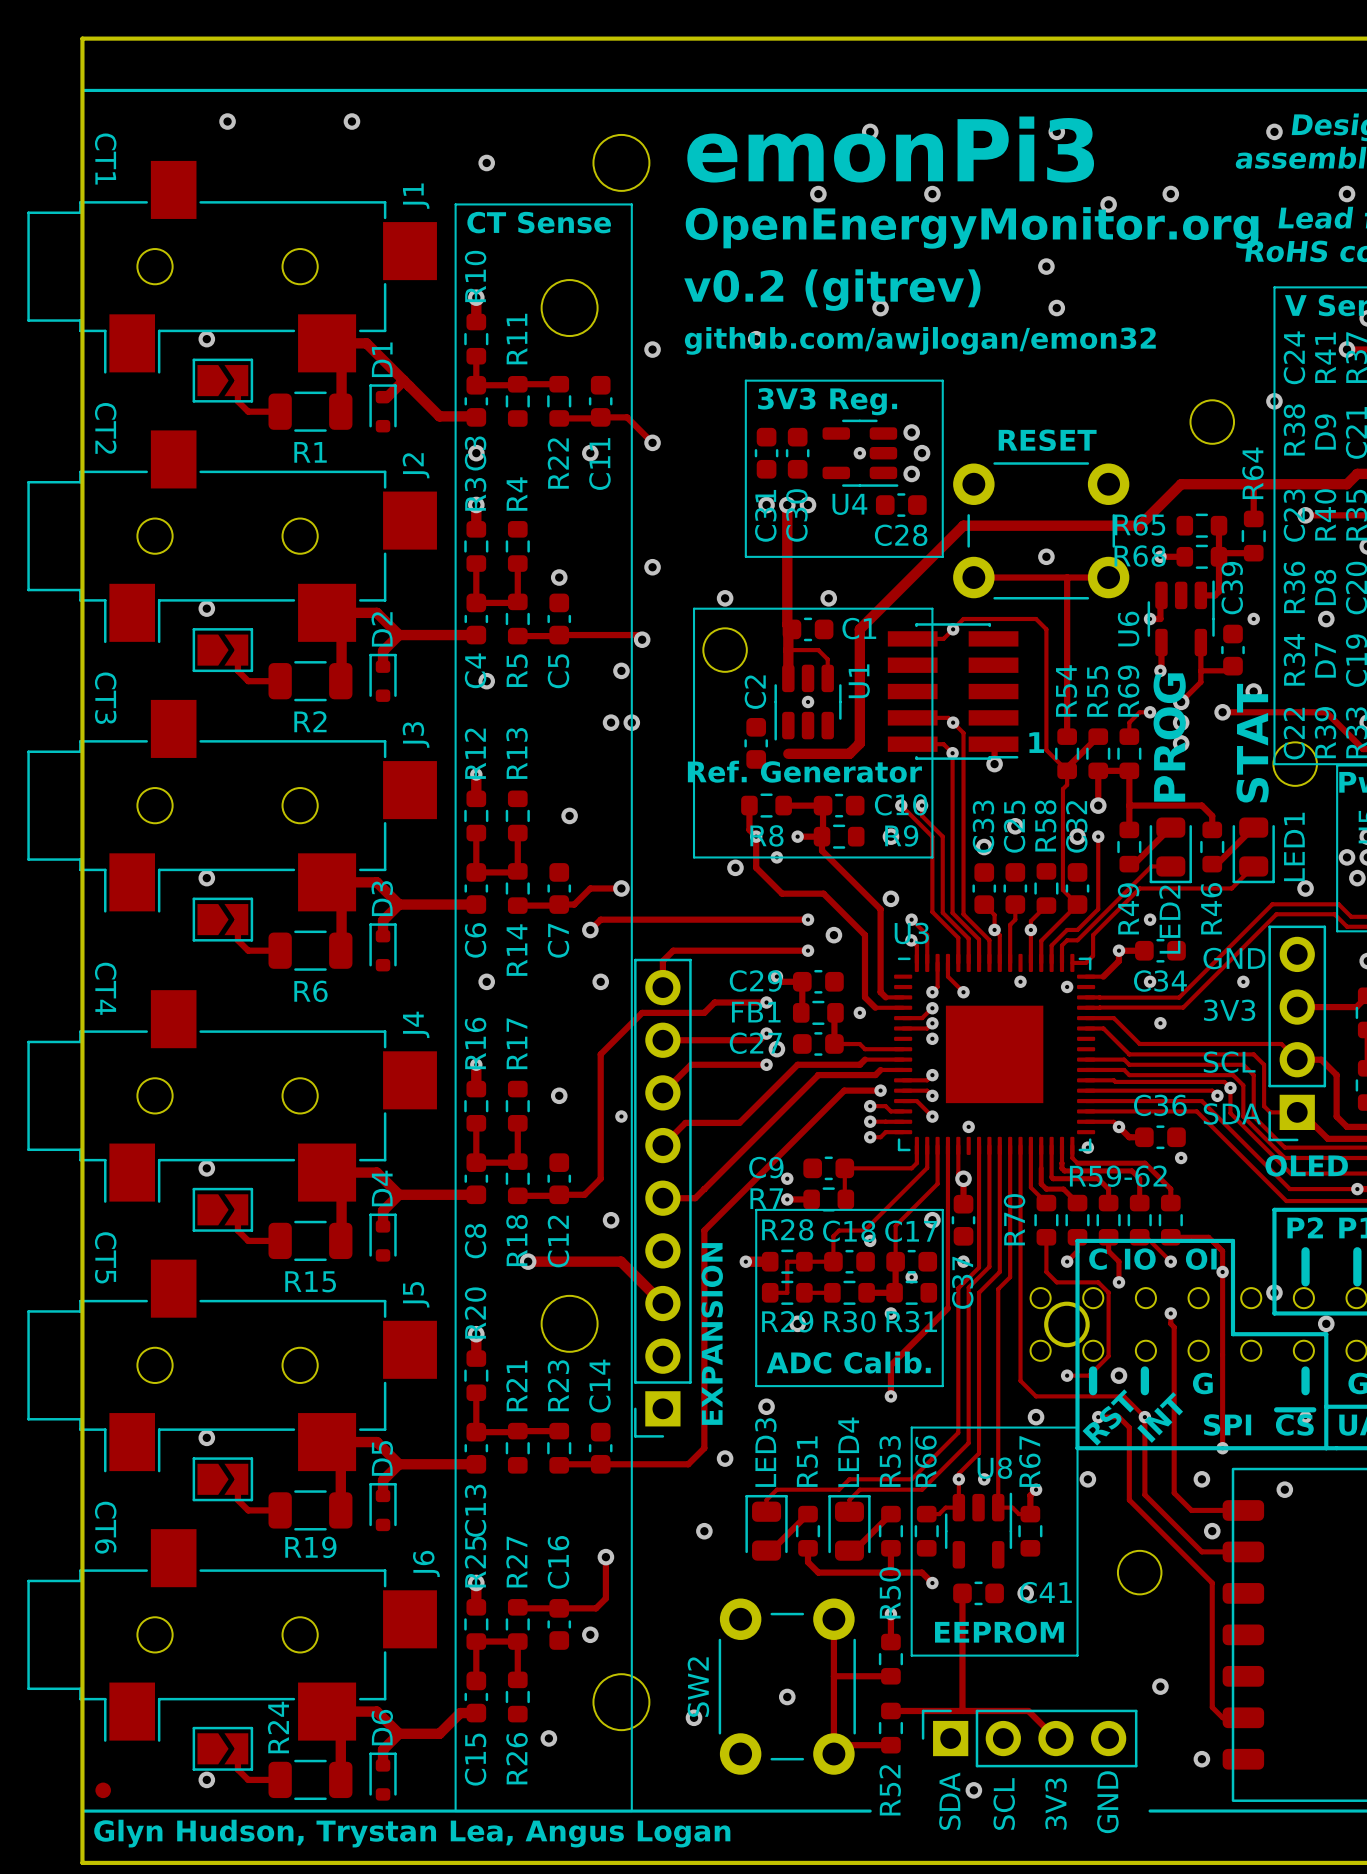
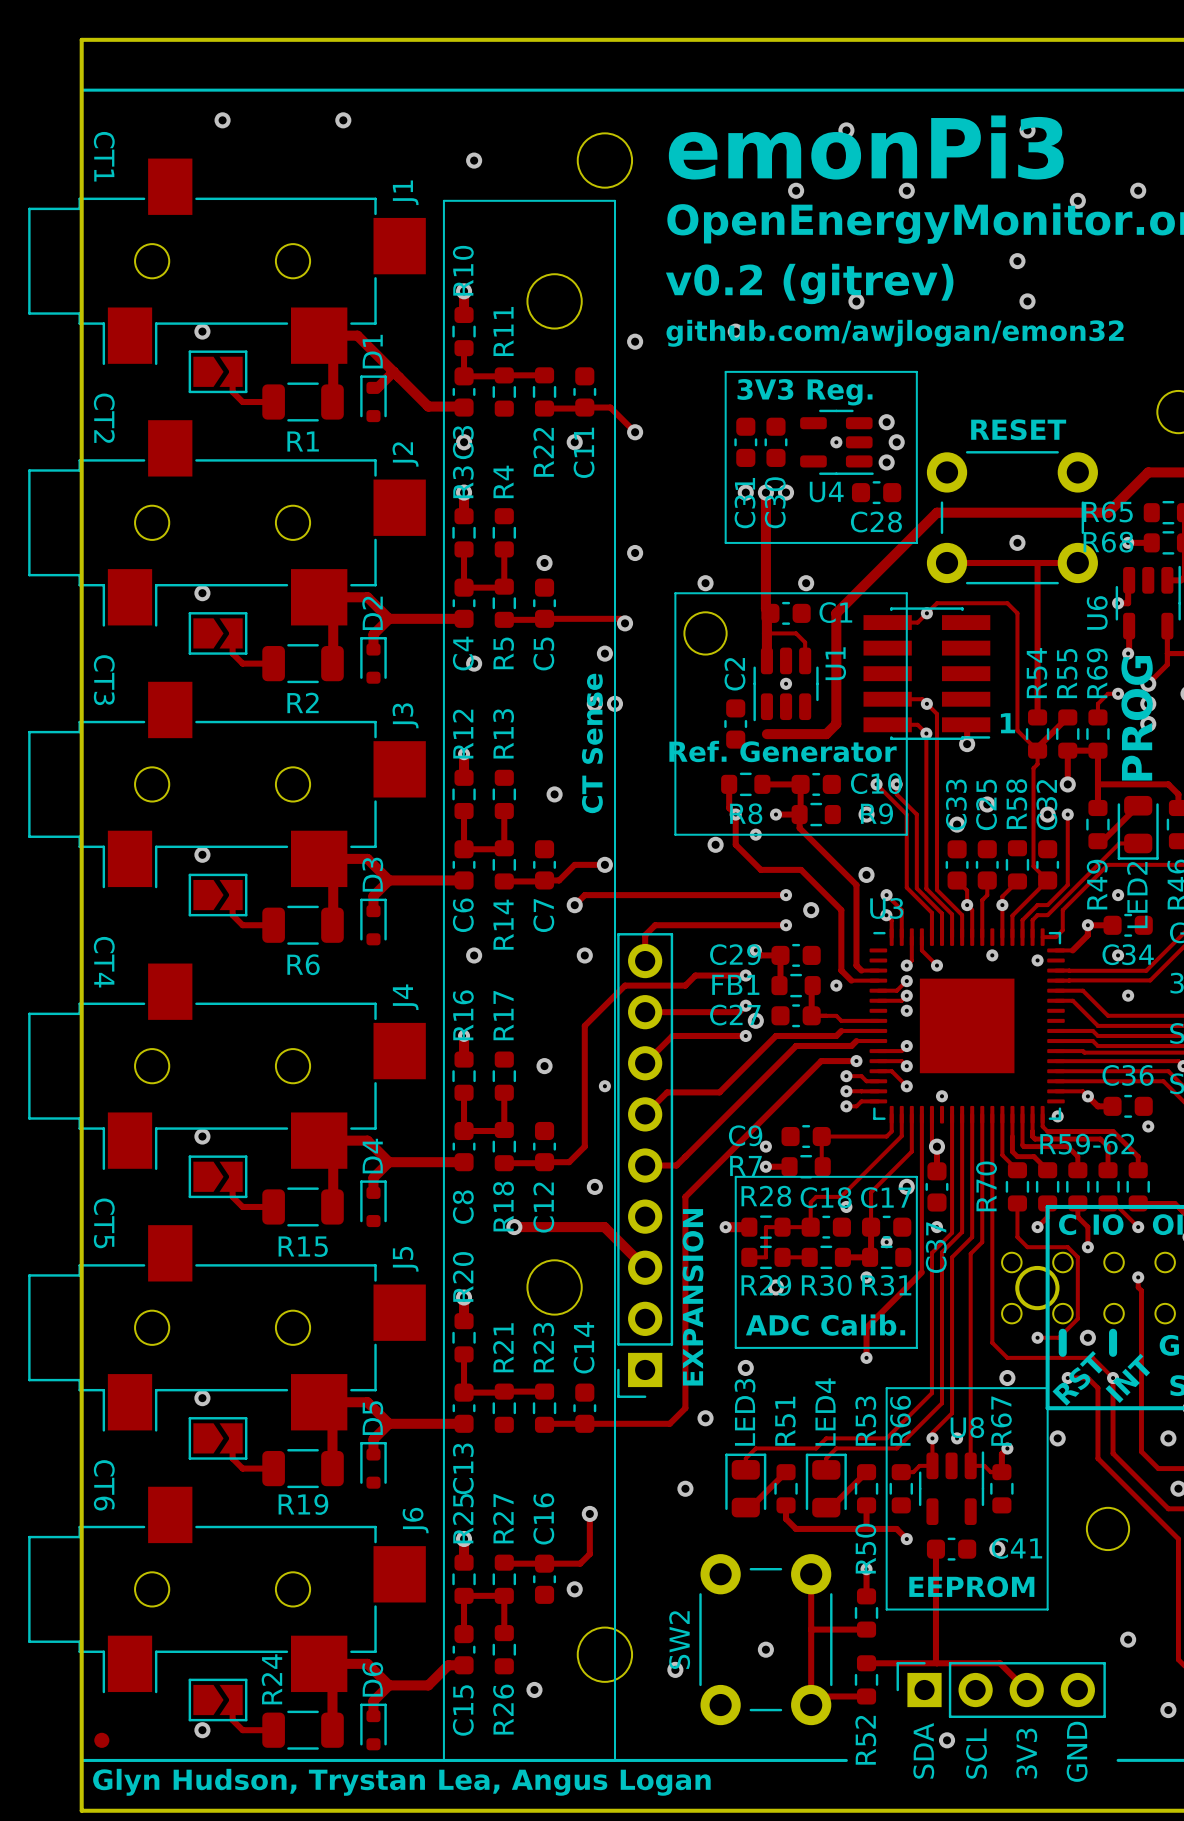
text: CT Sense (539, 222) -> none
text: none -> CT Sense (592, 743)

